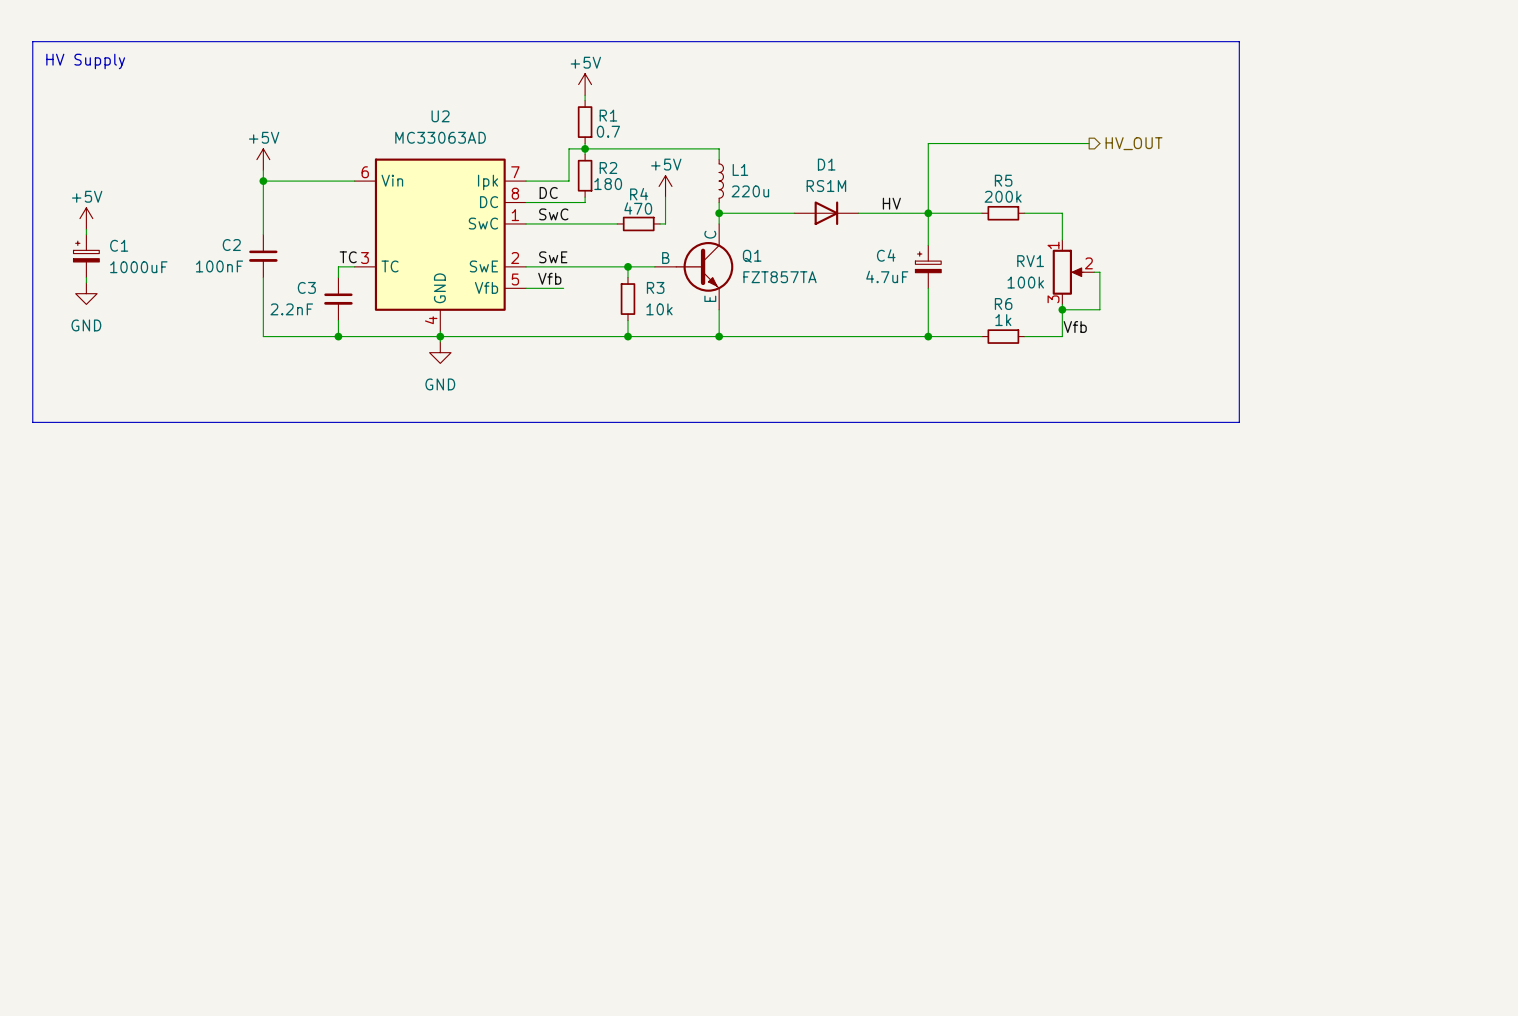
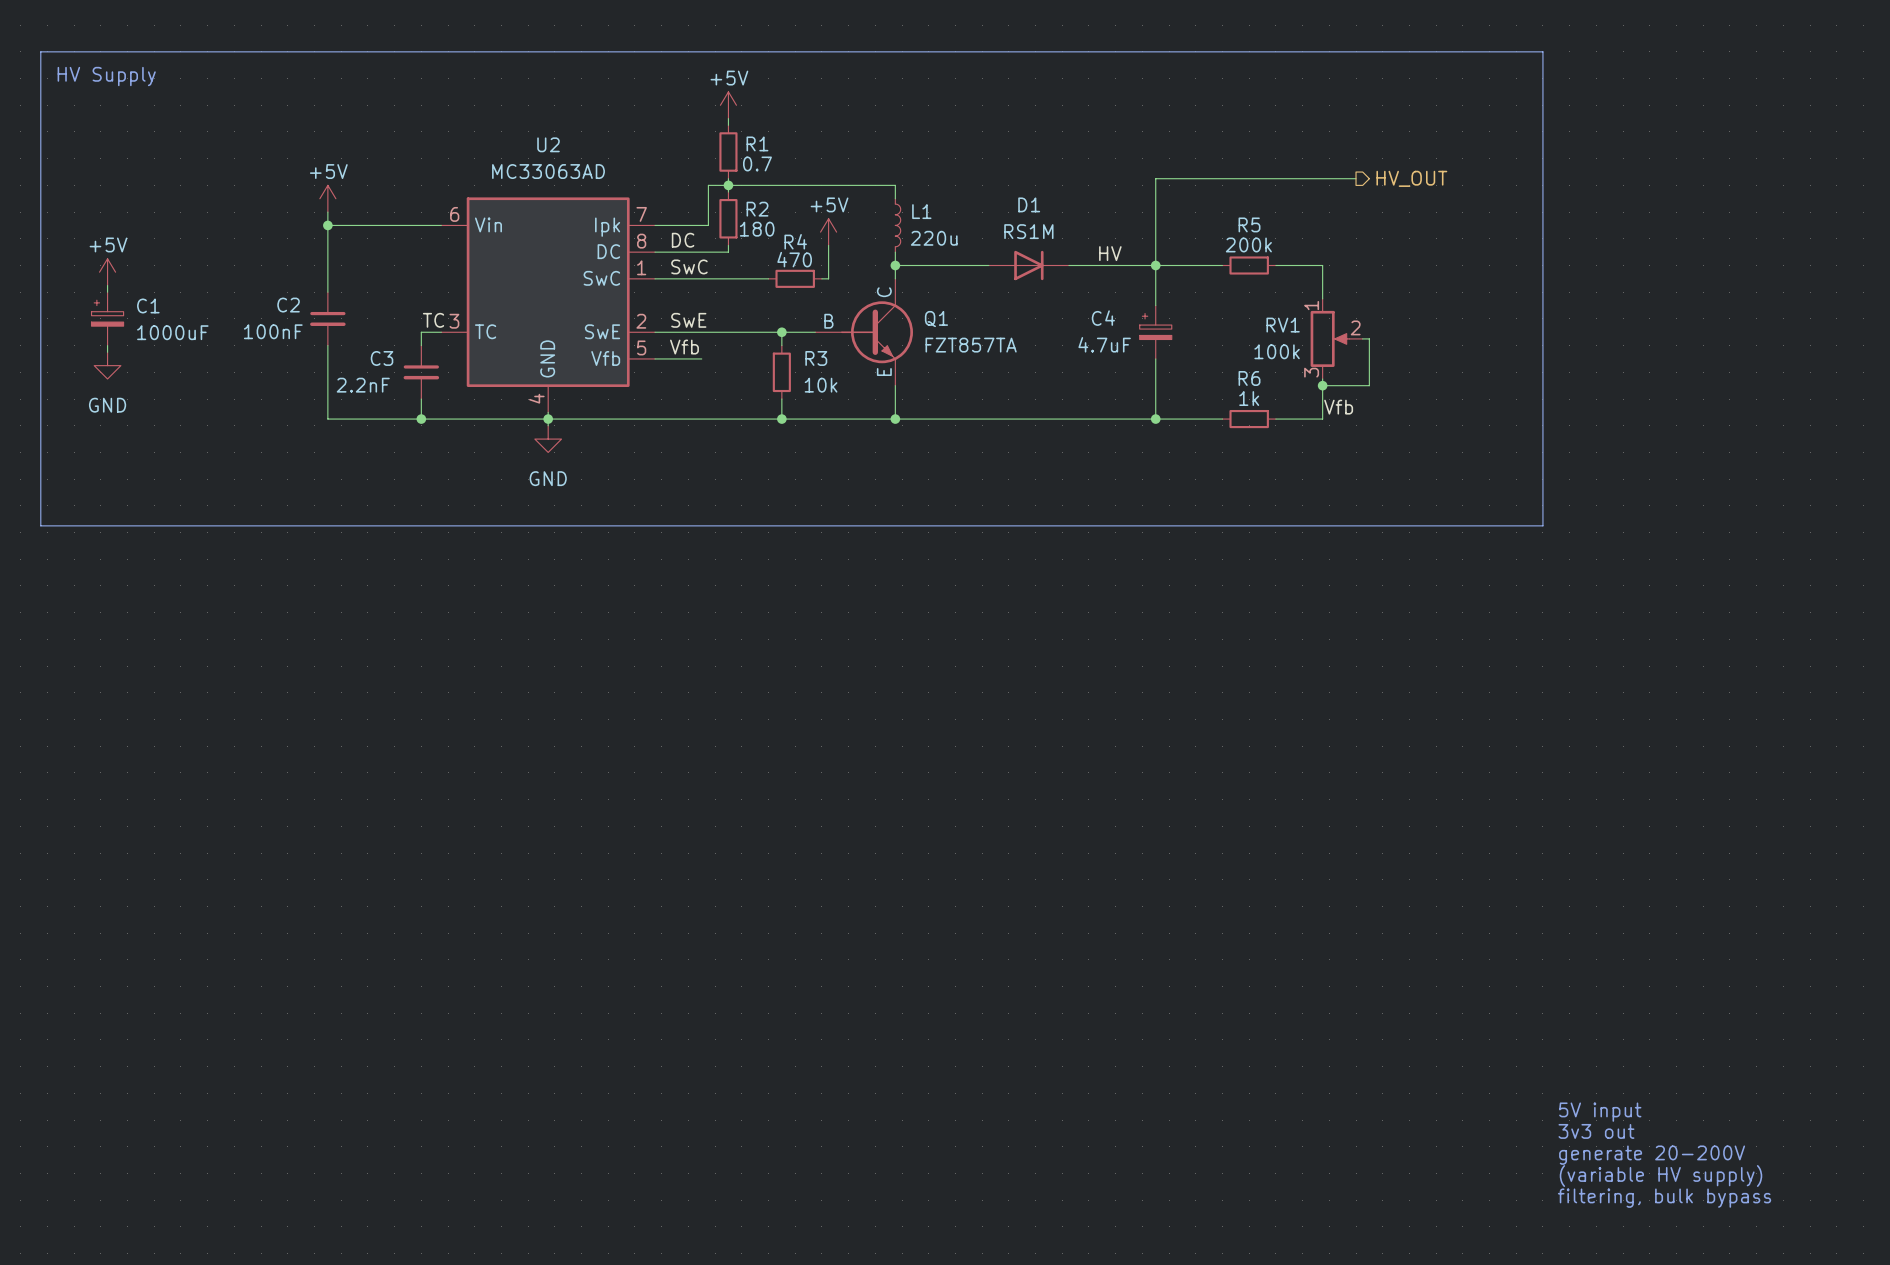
text: none -> 5V input (1600, 1112)
text: none -> 3v3 out (1596, 1131)
text: none -> generate 20-200V (1652, 1155)
text: none -> (variable HV supply) (1661, 1176)
text: none -> filtering, bulk bypass (1664, 1198)

